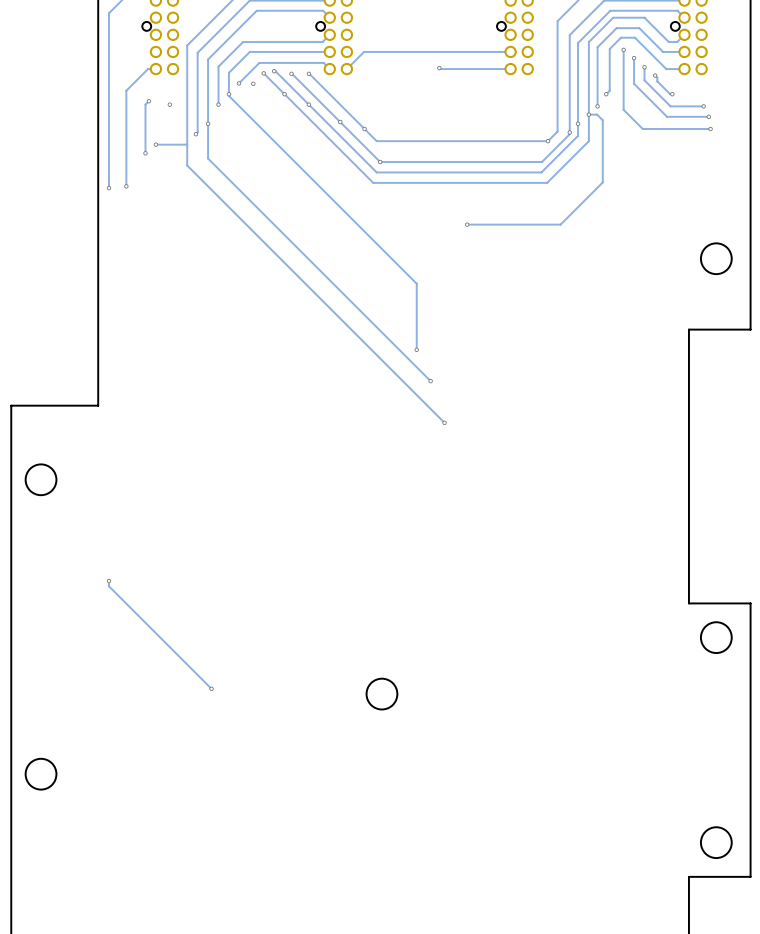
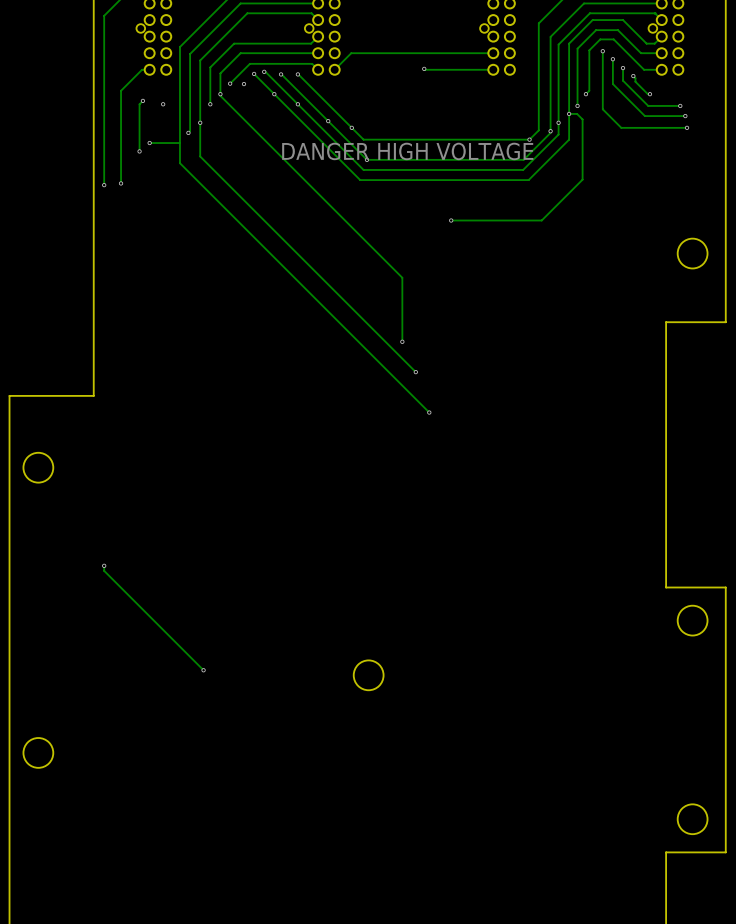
text: none -> DANGER HIGH VOLTAGE (407, 151)

